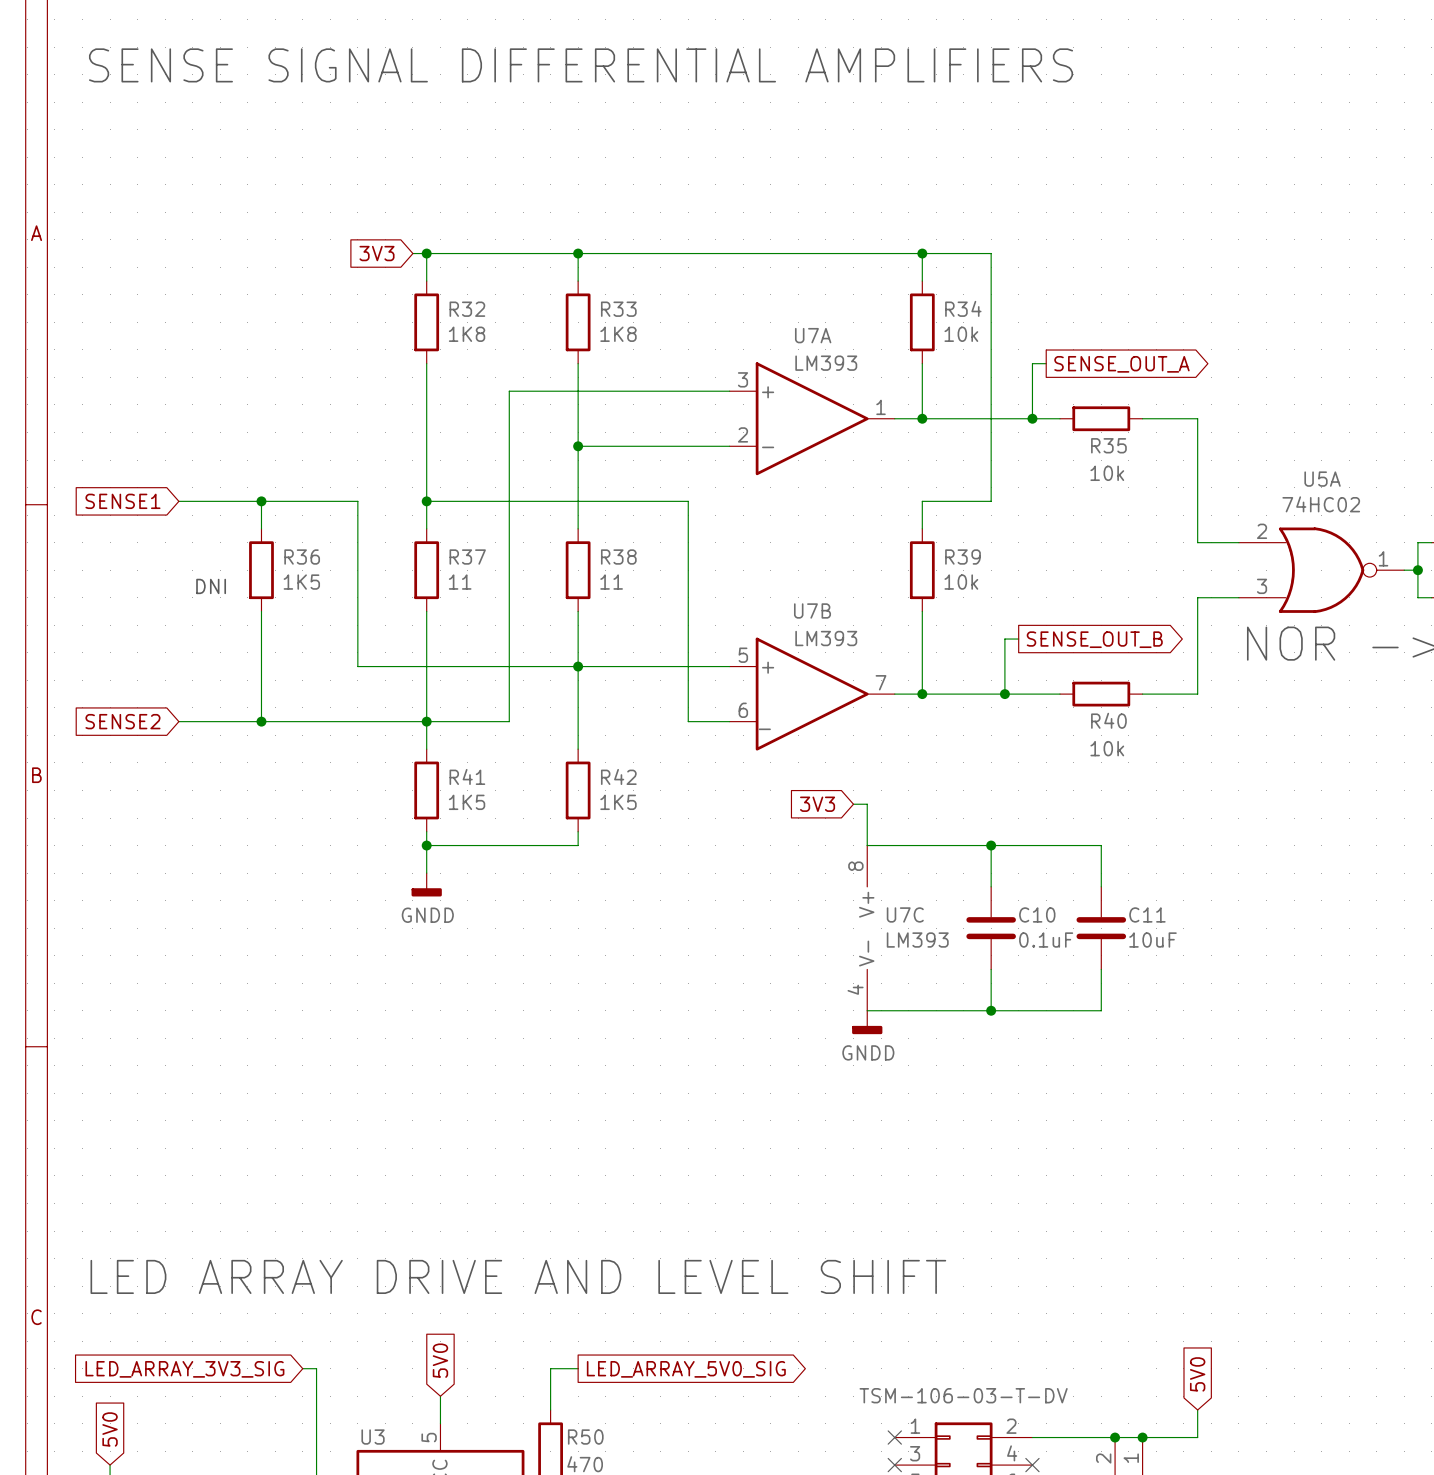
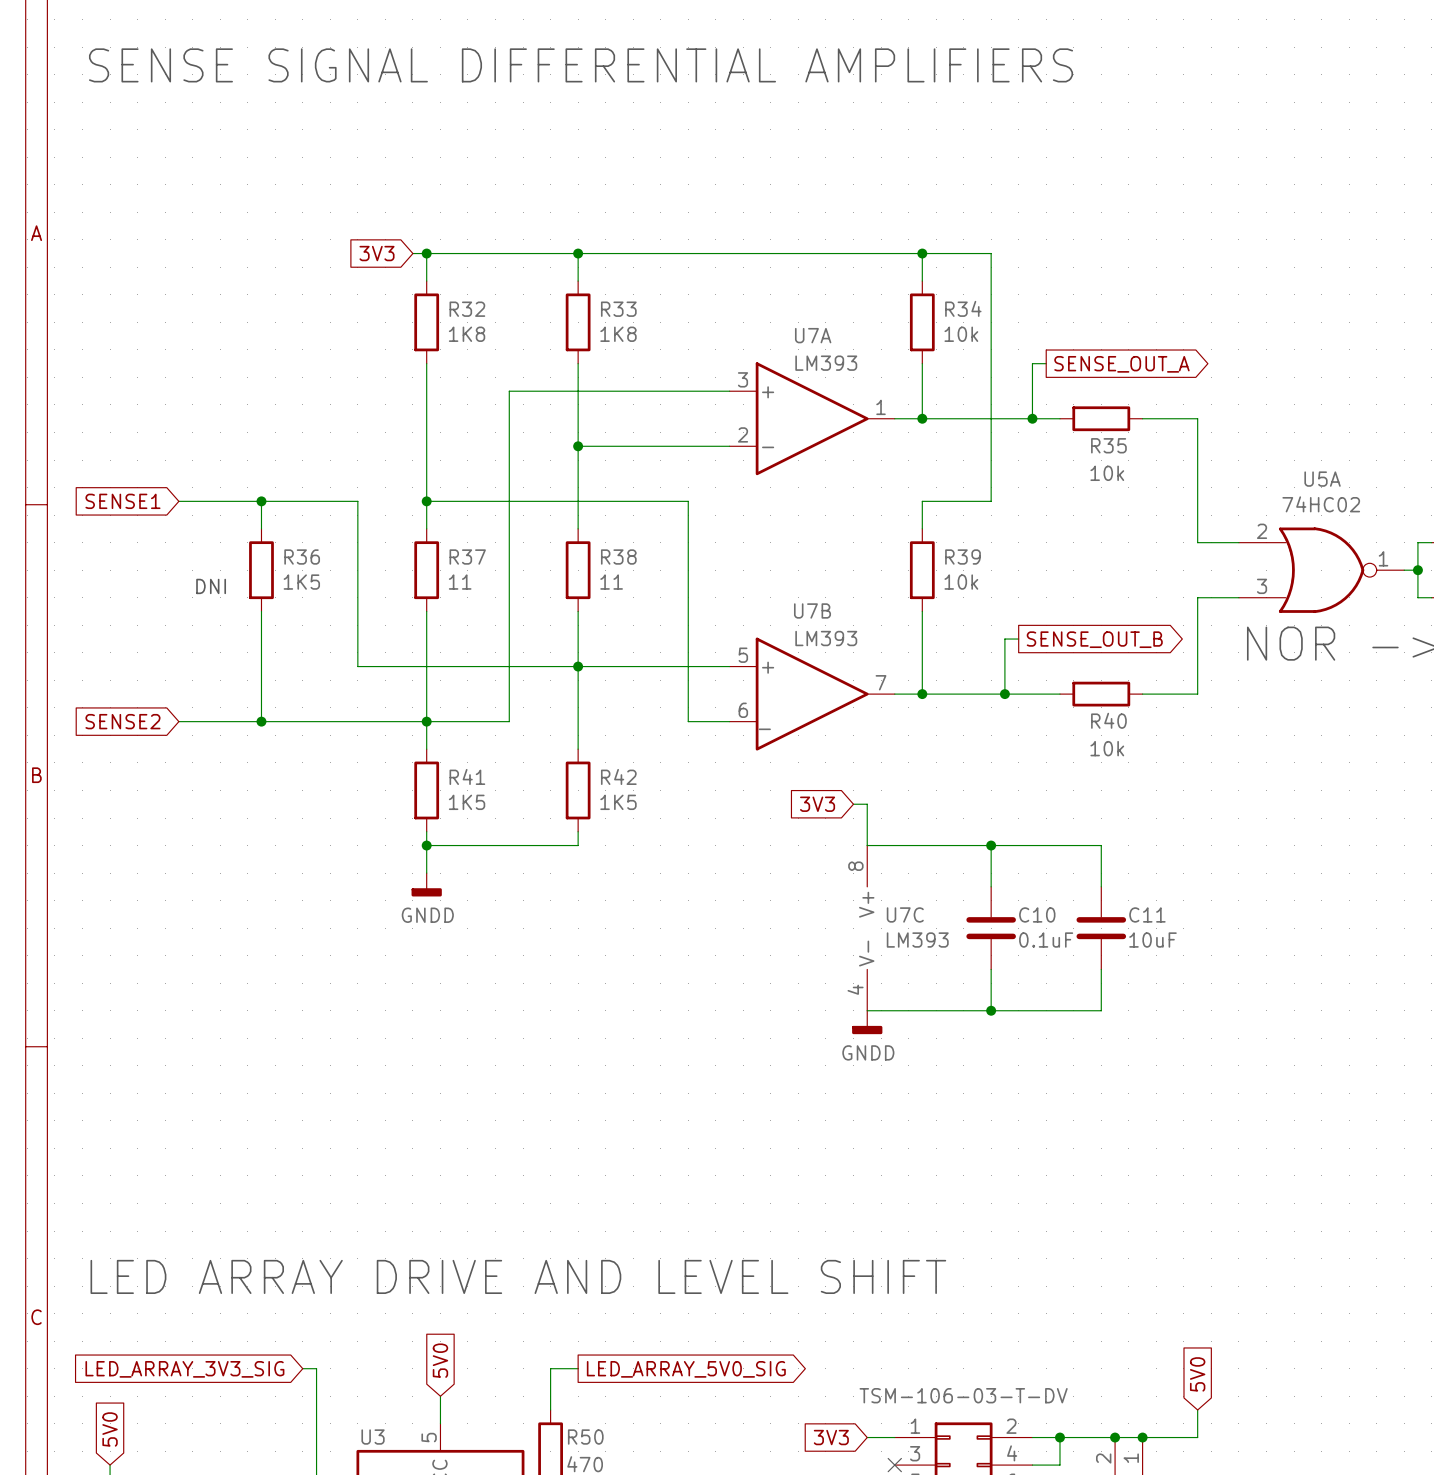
global label: none -> 3V3 (831, 1437)
wire: none -> (867, 1437) (894, 1437)
no-connect mark: (894, 1437) -> none
wire: none -> (1059, 1437) (1059, 1465) (1032, 1465)
junction: none -> (1059, 1437)
no-connect mark: (1032, 1465) -> none

